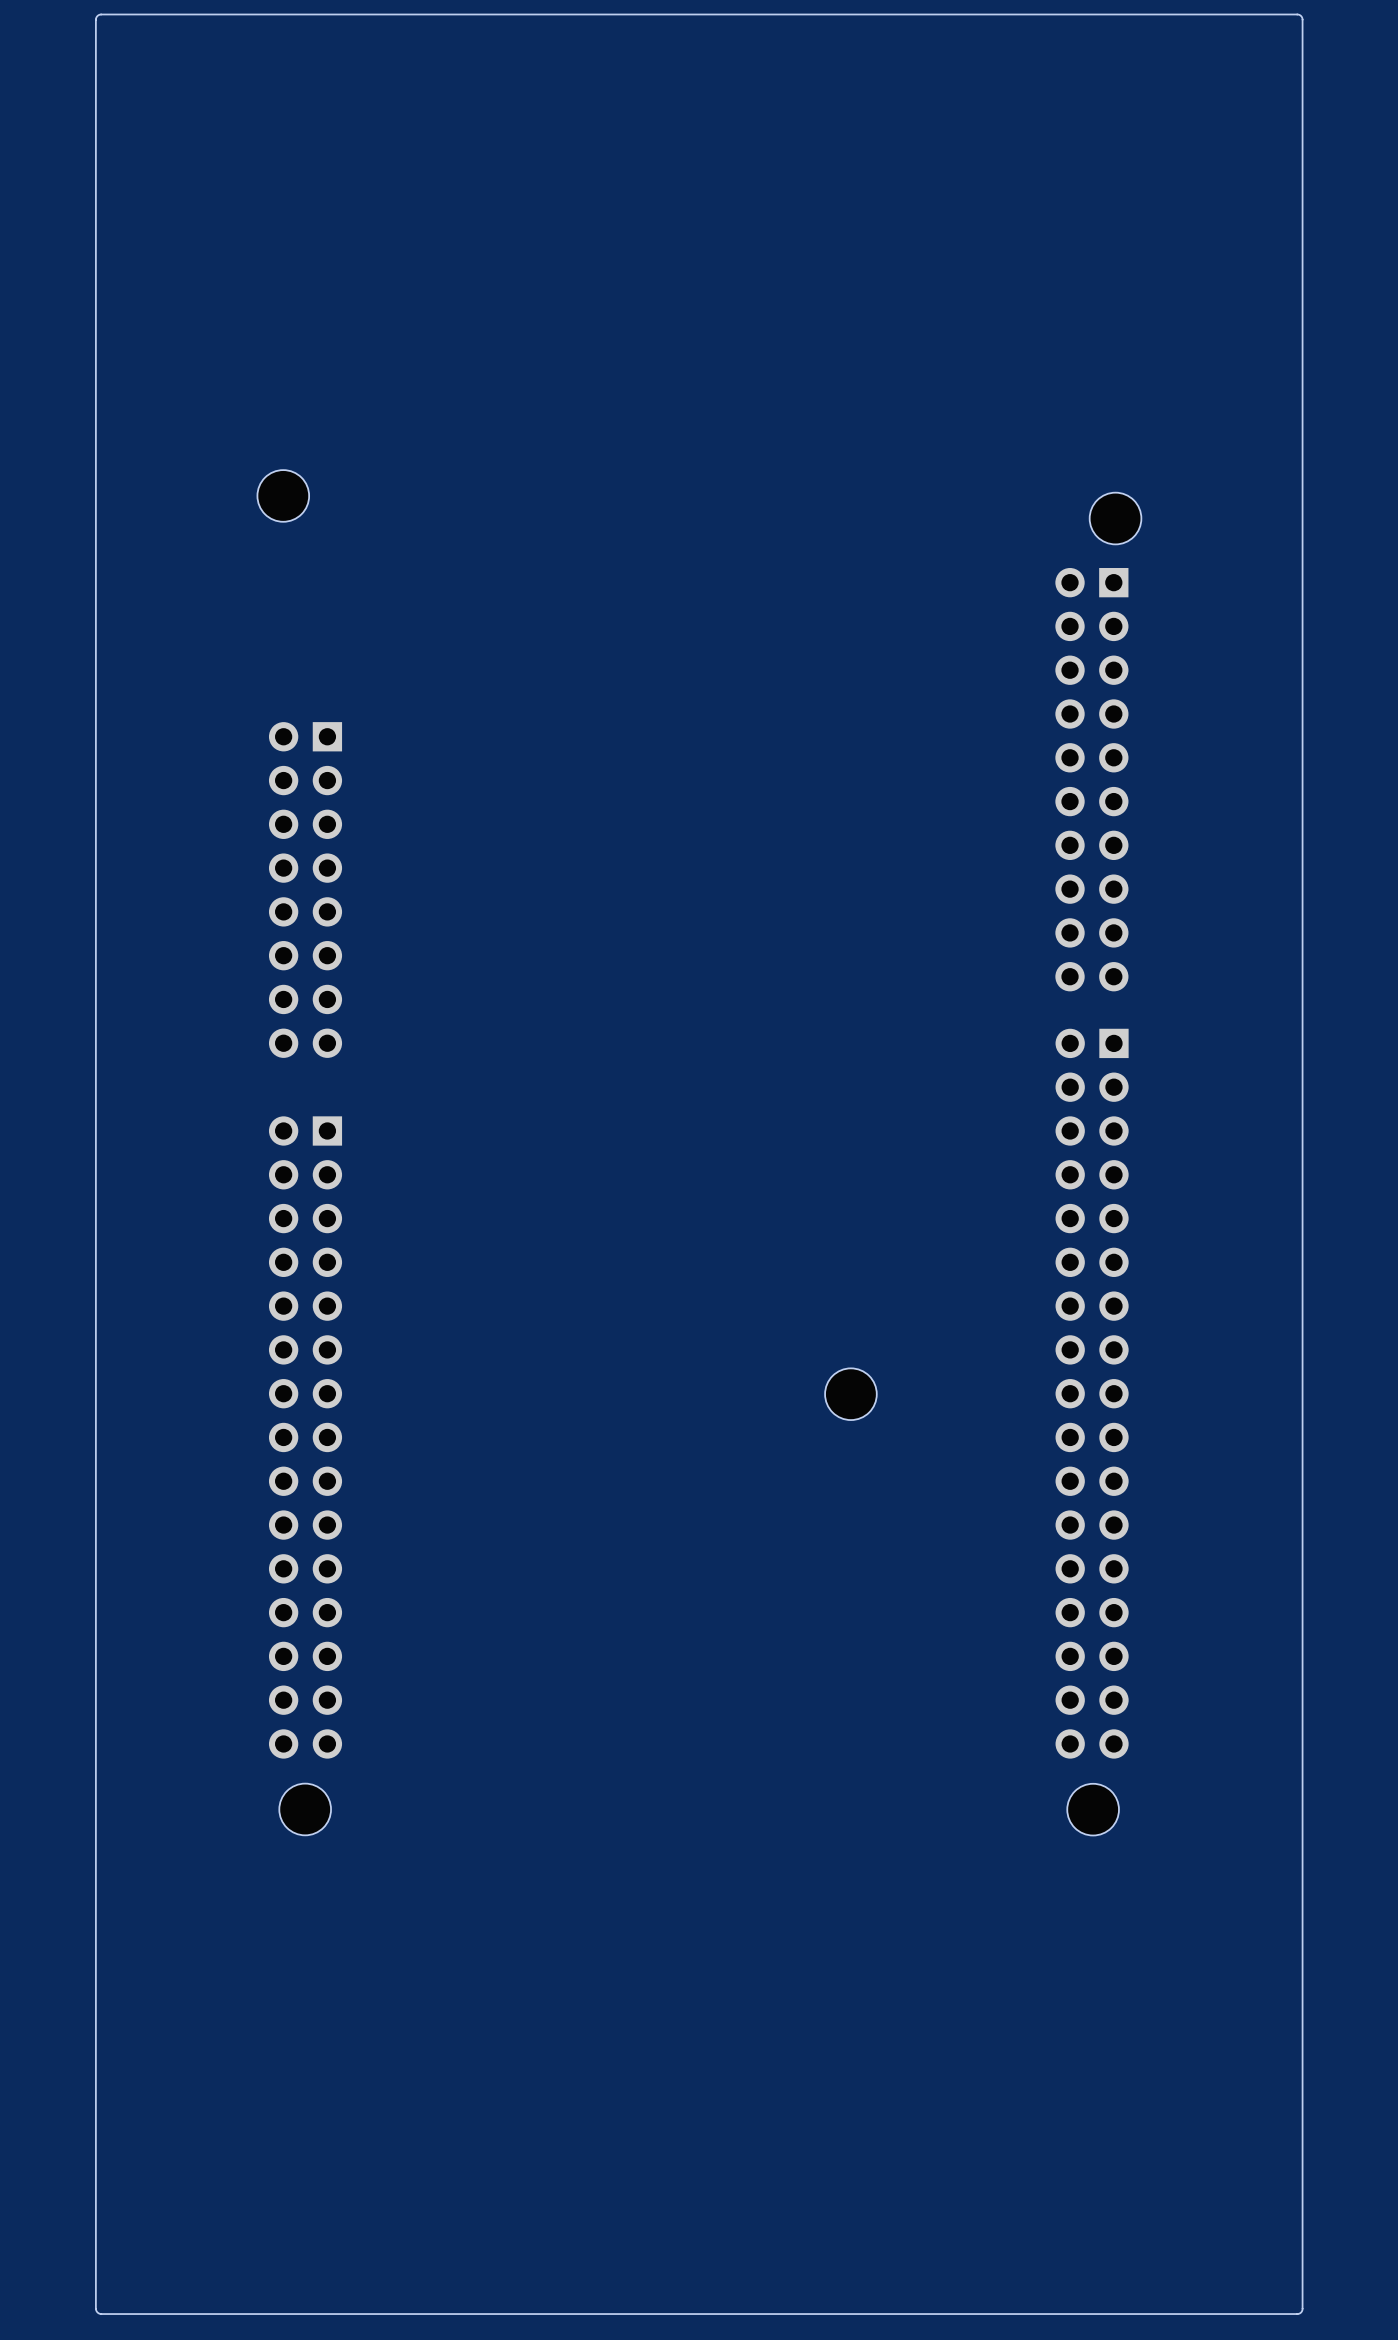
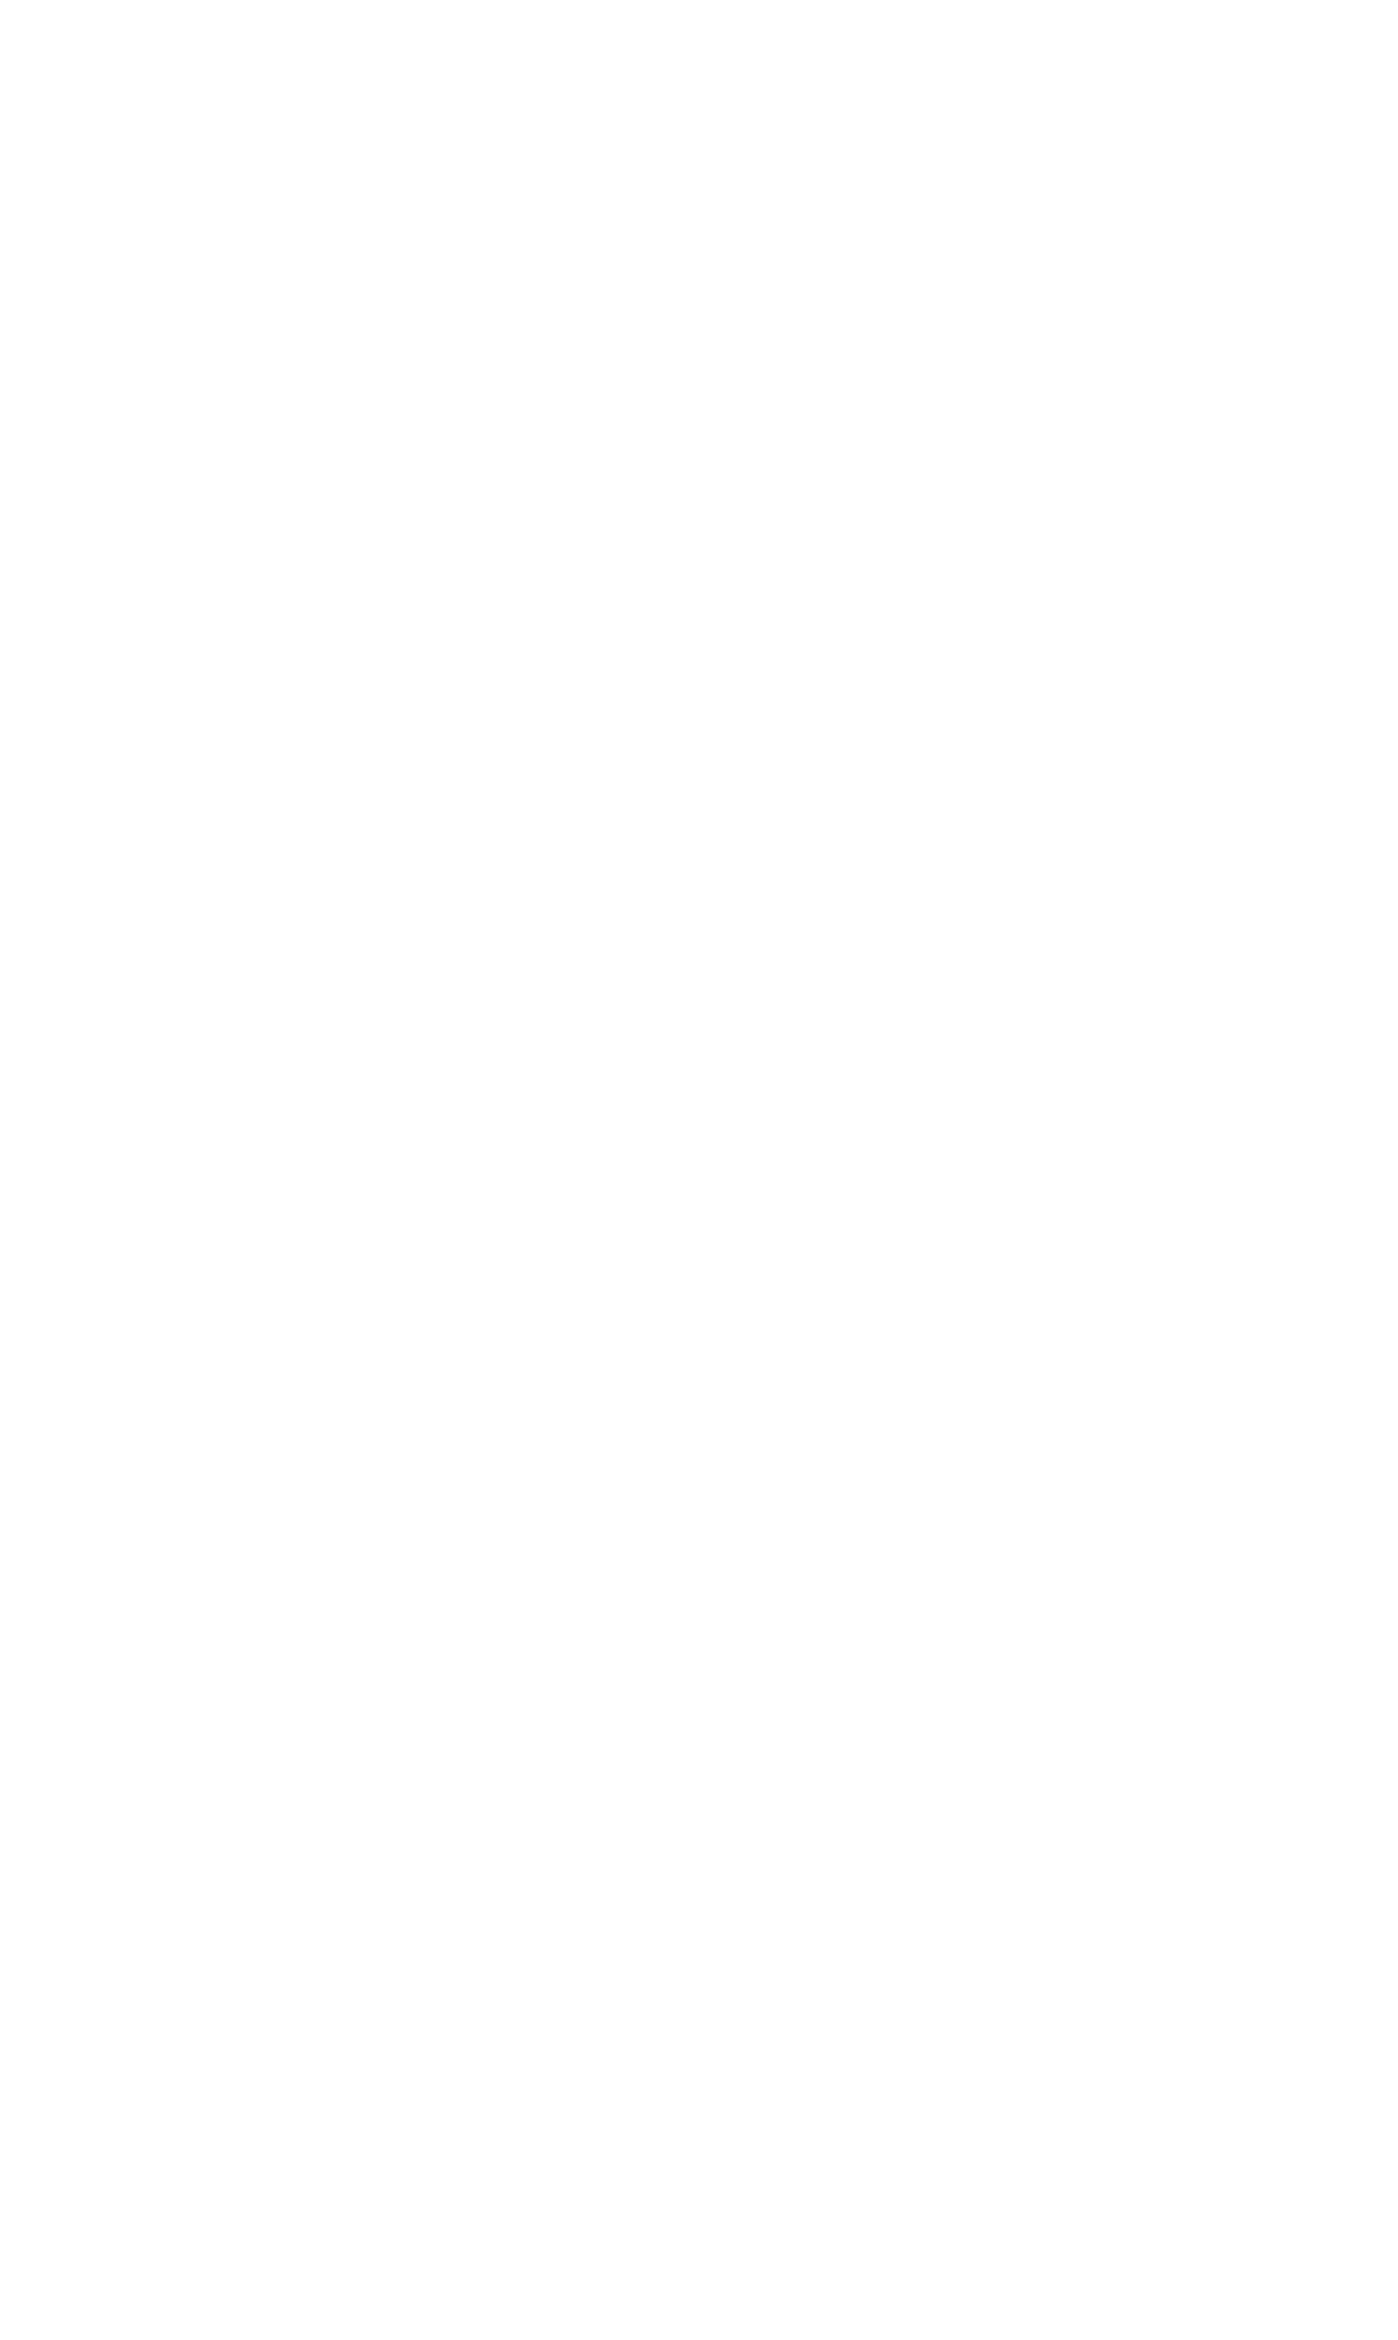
board edge: (101, 14) (1297, 14) (1302, 17) (1302, 2308) (1299, 2313) (101, 2314) (96, 2310) (95, 19) (101, 14) -> none
part: (283, 495) -> none
part: (1115, 518) -> none
part: (1091, 779) -> none
part: (305, 890) -> none
part: (1092, 1393) -> none
part: (850, 1394) -> none
part: (305, 1437) -> none
part: (305, 1809) -> none
part: (1093, 1809) -> none

